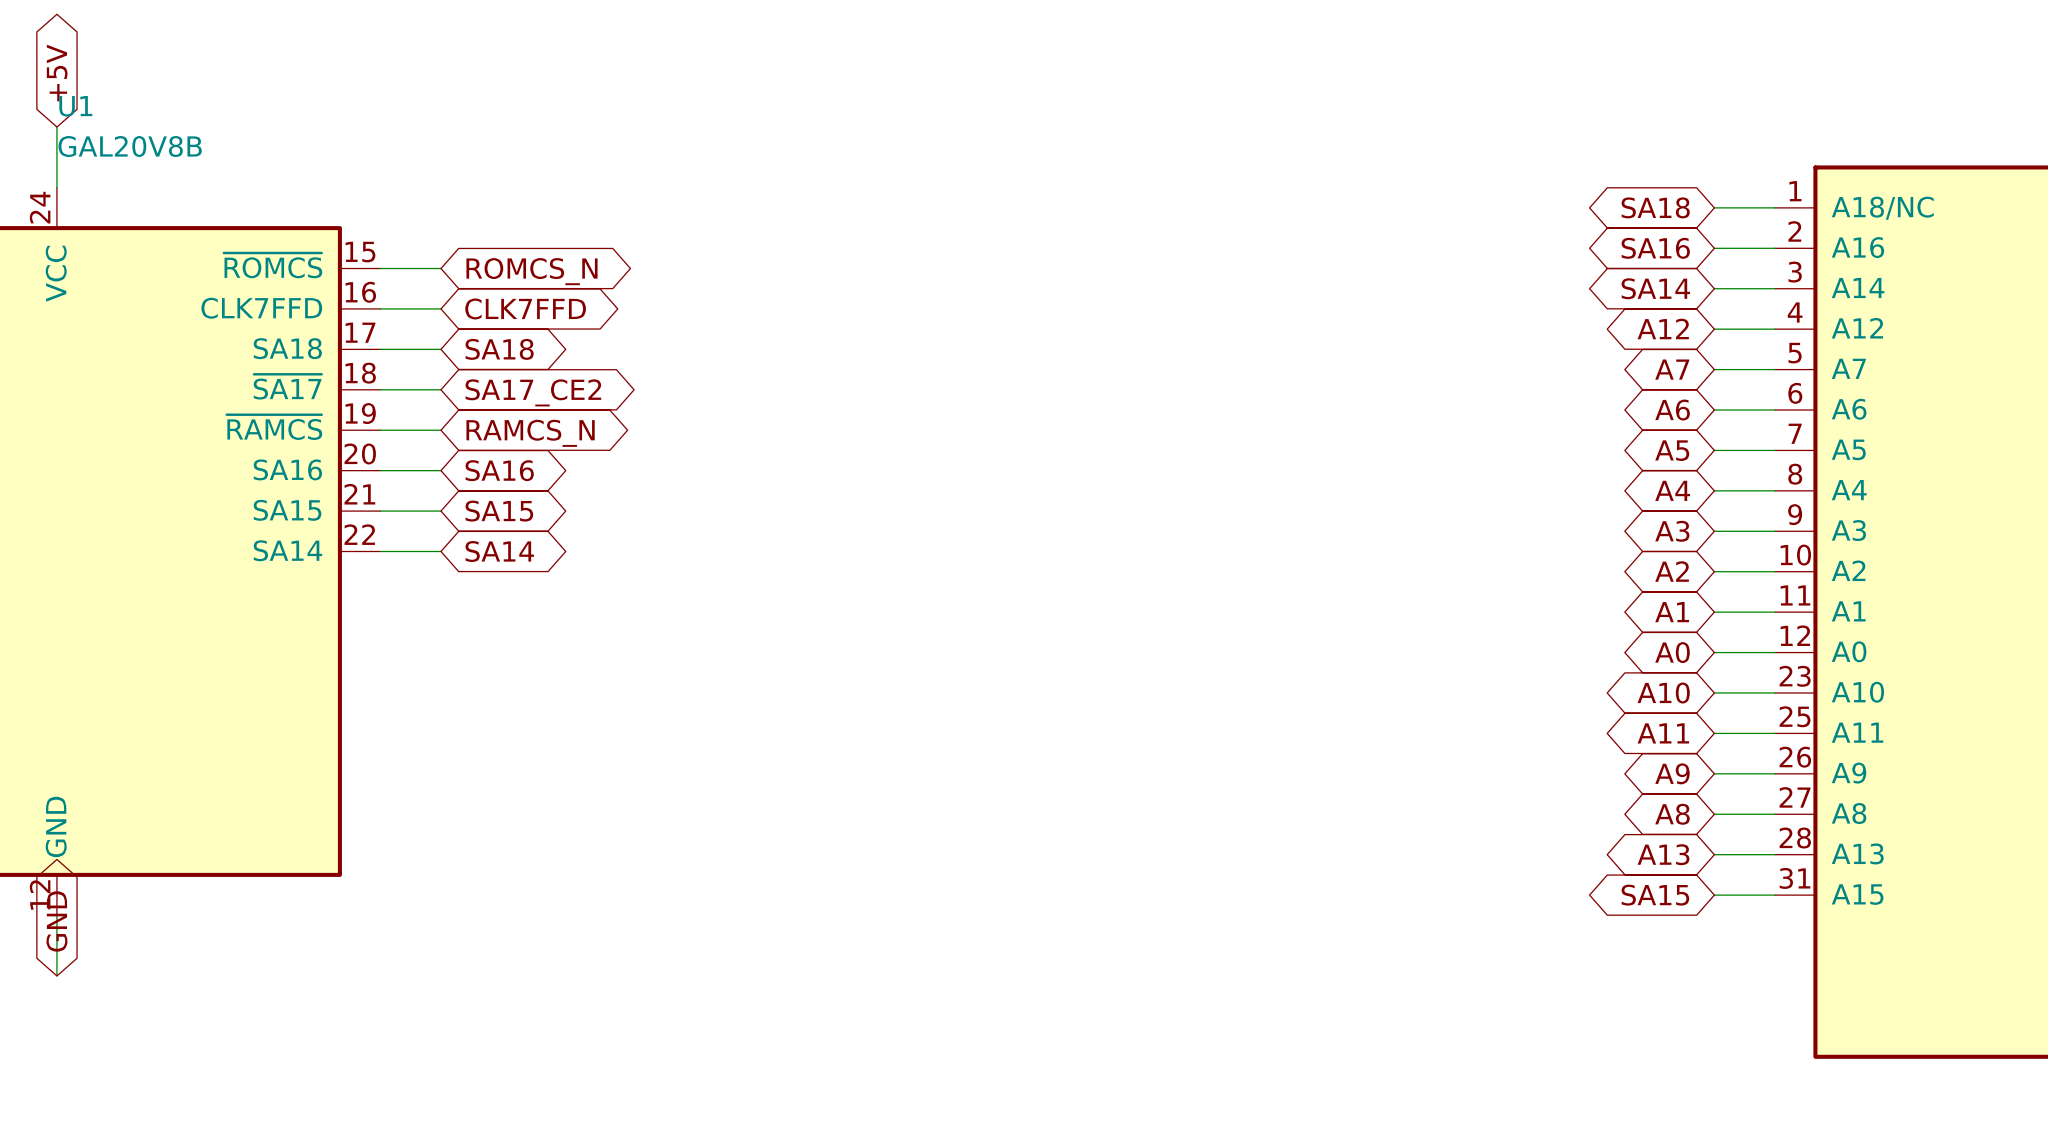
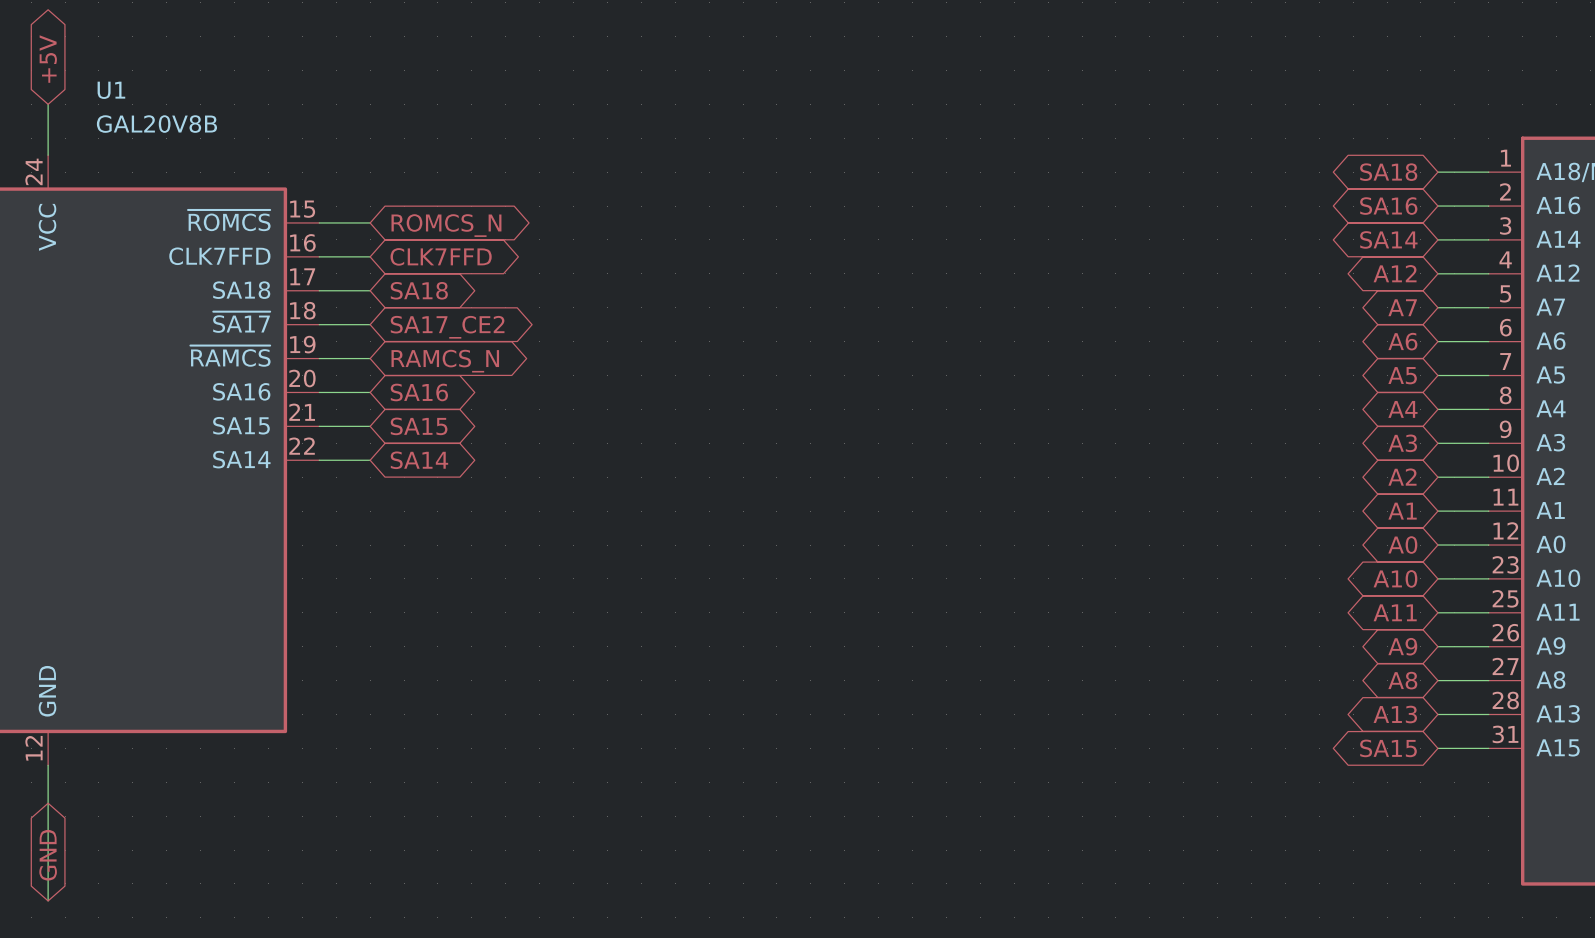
U1 name position: U1 (75, 106) -> U1 (111, 90)
U1 value position: GAL20V8B (130, 146) -> GAL20V8B (156, 124)
global label position: GND (56, 921) -> GND (48, 855)
wire: none -> (48, 816) (48, 900)

